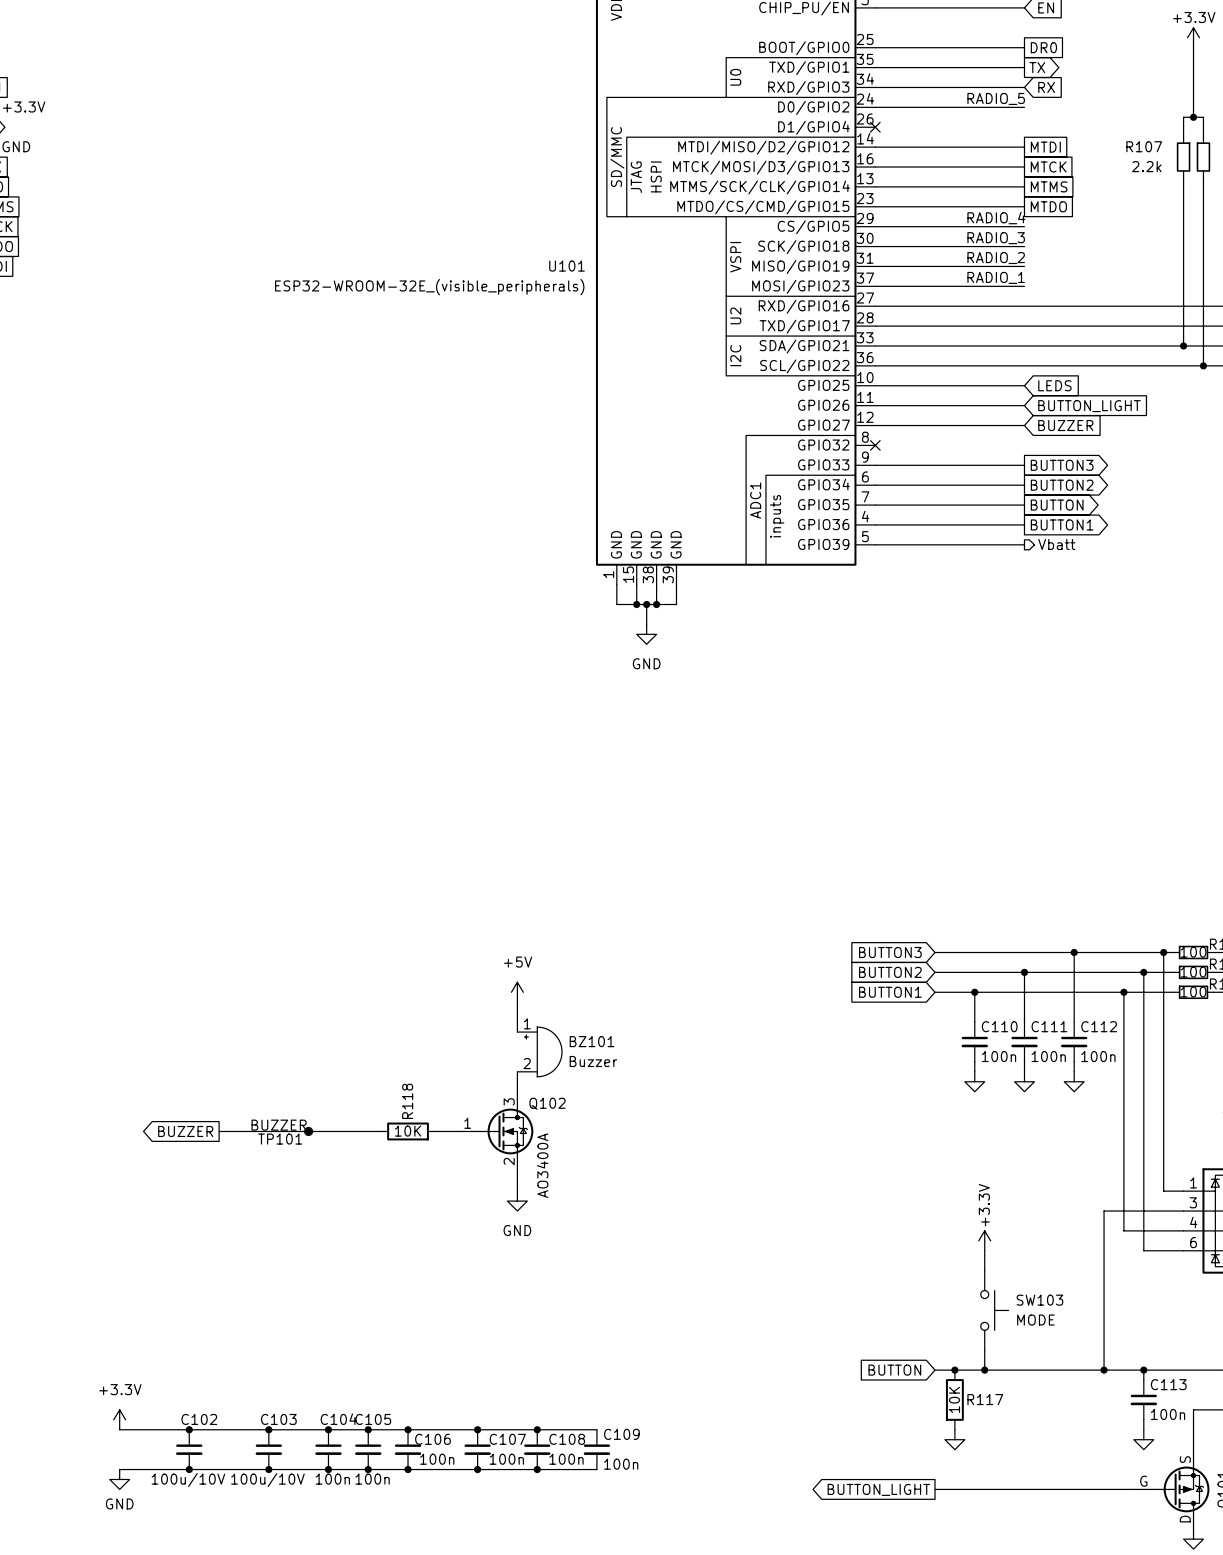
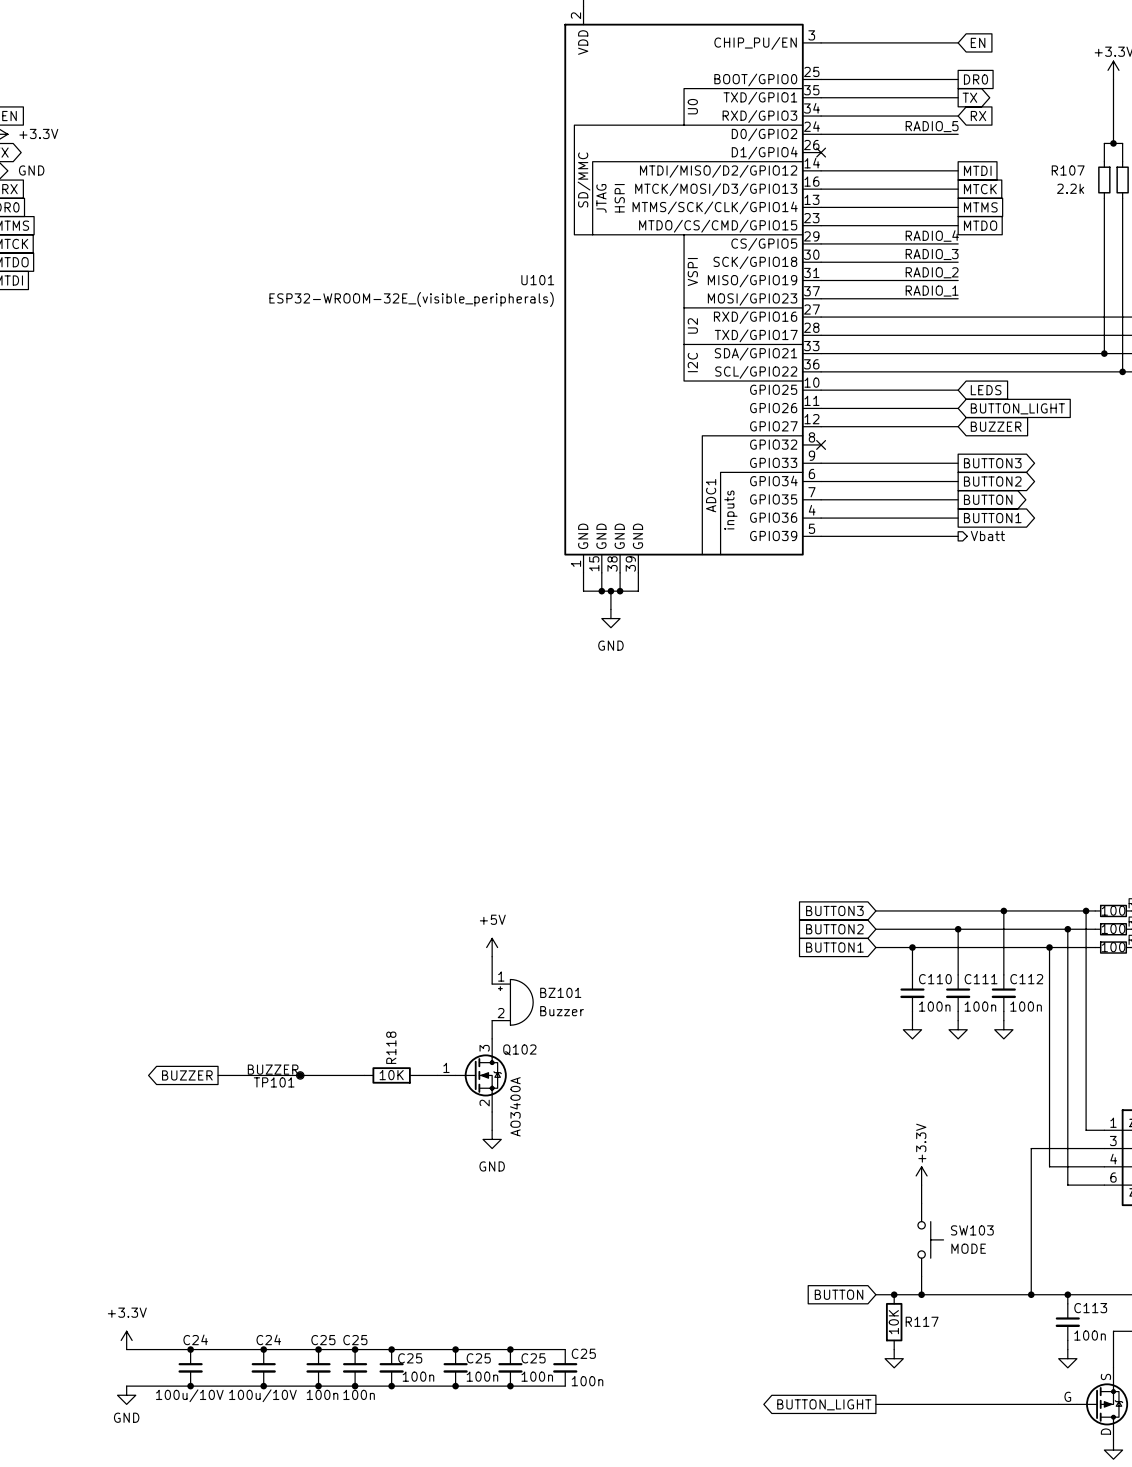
C102 name: C102 (199, 1419) -> C24 (195, 1339)
C103 name: C103 (278, 1419) -> C24 (268, 1339)
C104 name: C104 (338, 1419) -> C25 (323, 1340)
C105 name: C105 (373, 1419) -> C25 (355, 1340)
C109 name: C109 (621, 1434) -> C25 (583, 1353)
C106 name: C106 (432, 1439) -> C25 (410, 1358)
C107 name: C107 (507, 1439) -> C25 (478, 1358)
C108 name: C108 (567, 1439) -> C25 (533, 1358)

